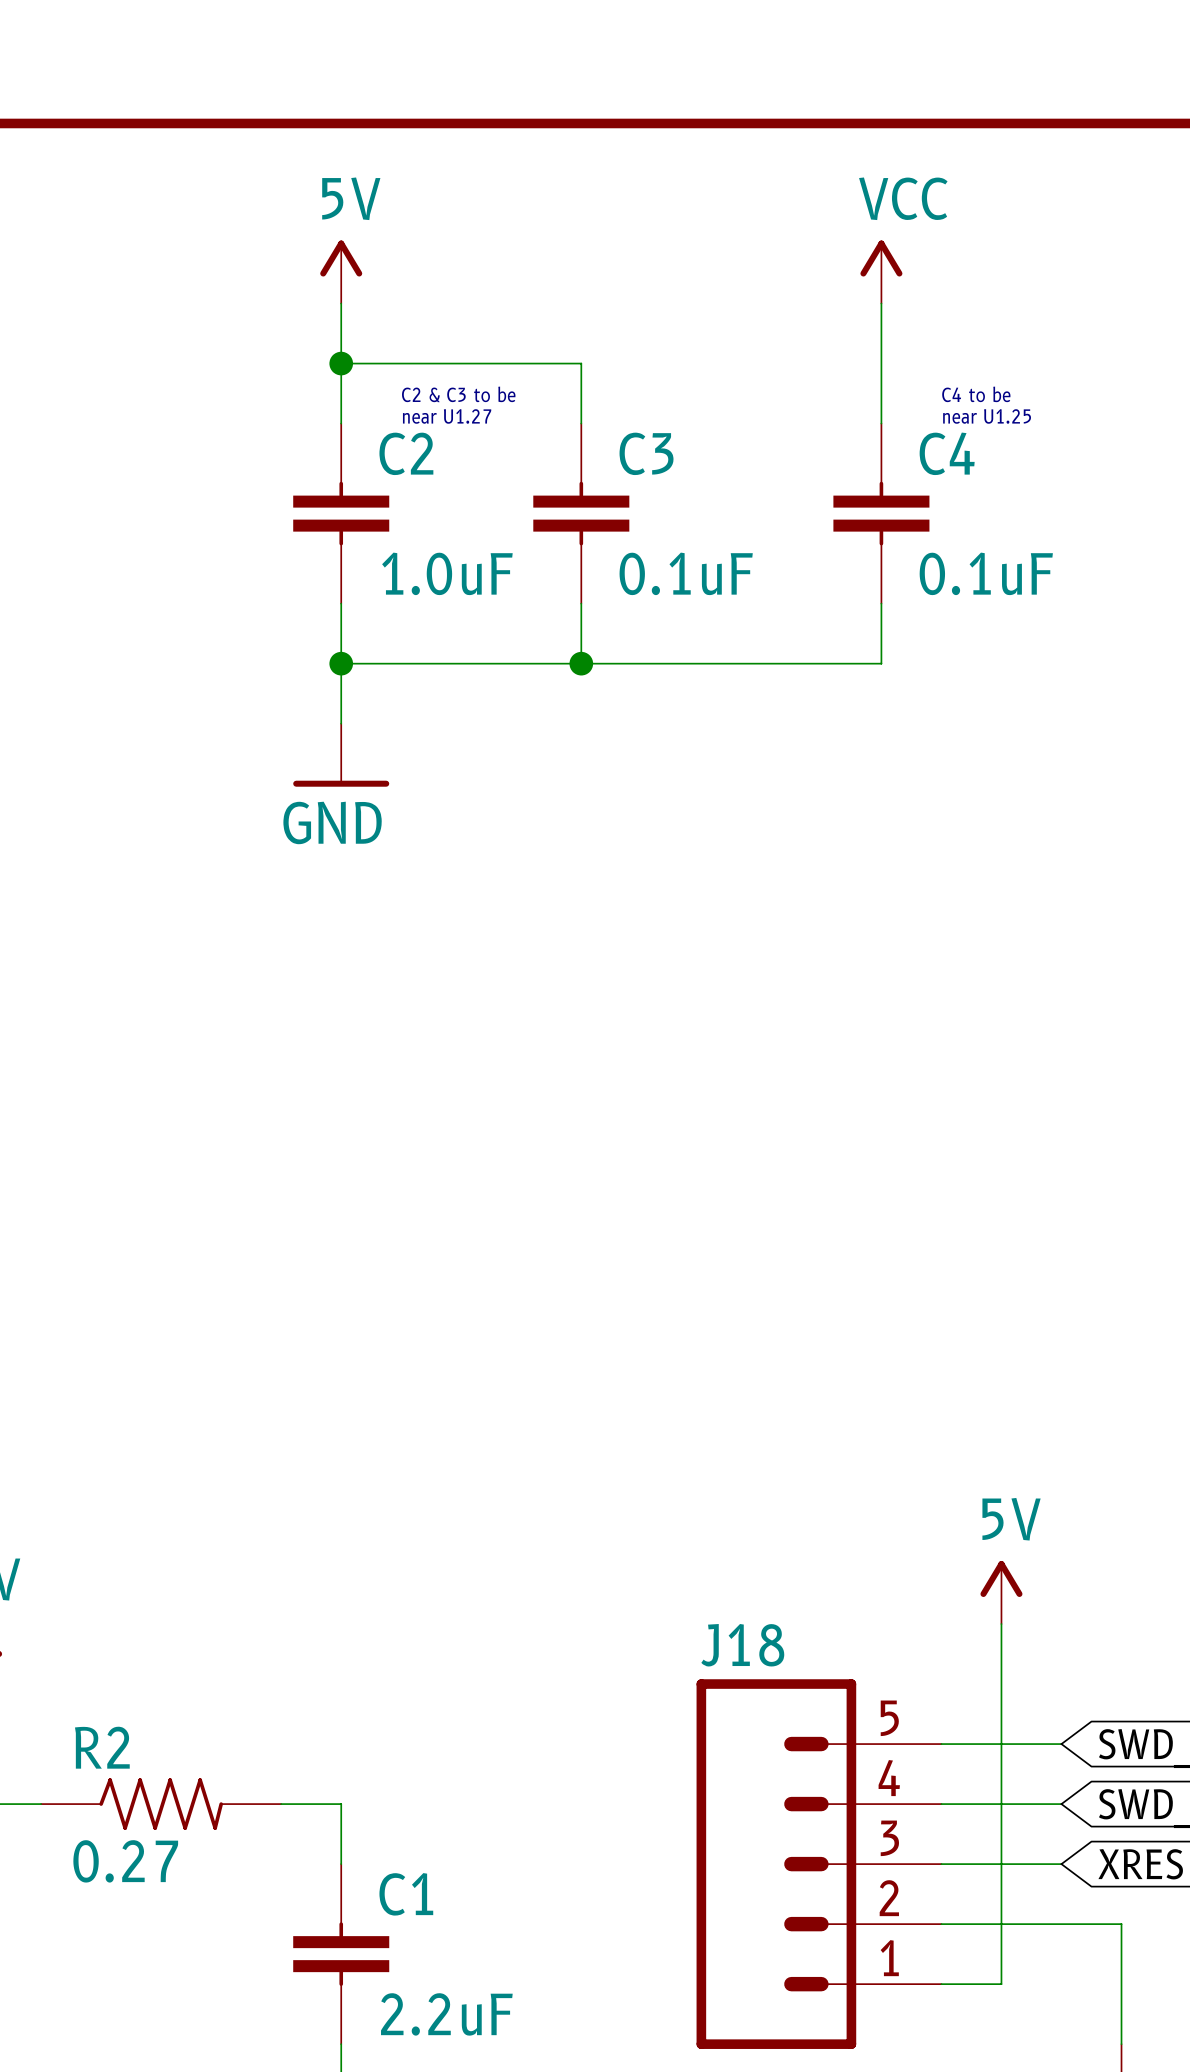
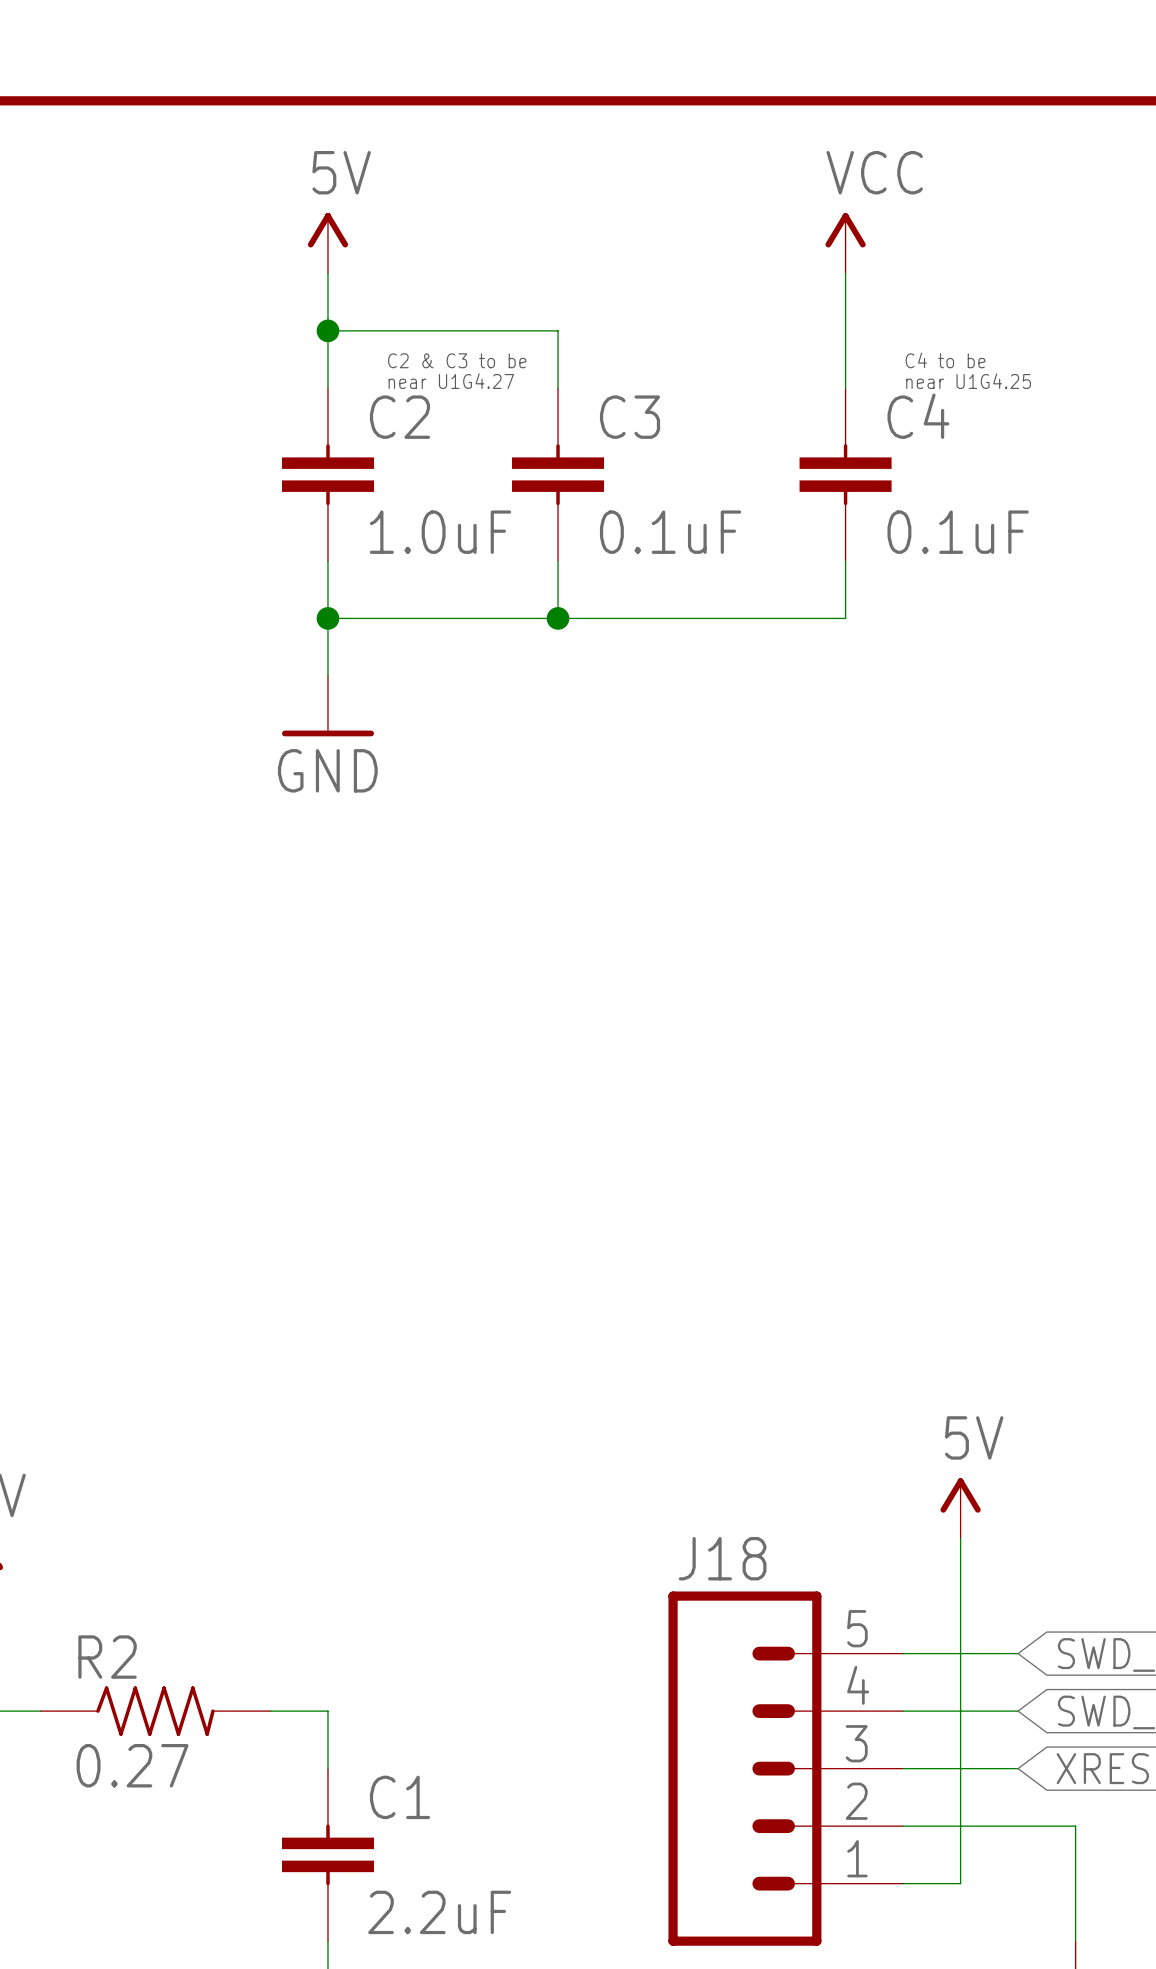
text: near U1.27 (447, 416) -> near U1G4.27 (451, 381)
text: near U1.25 (987, 416) -> near U1G4.25 (968, 381)

